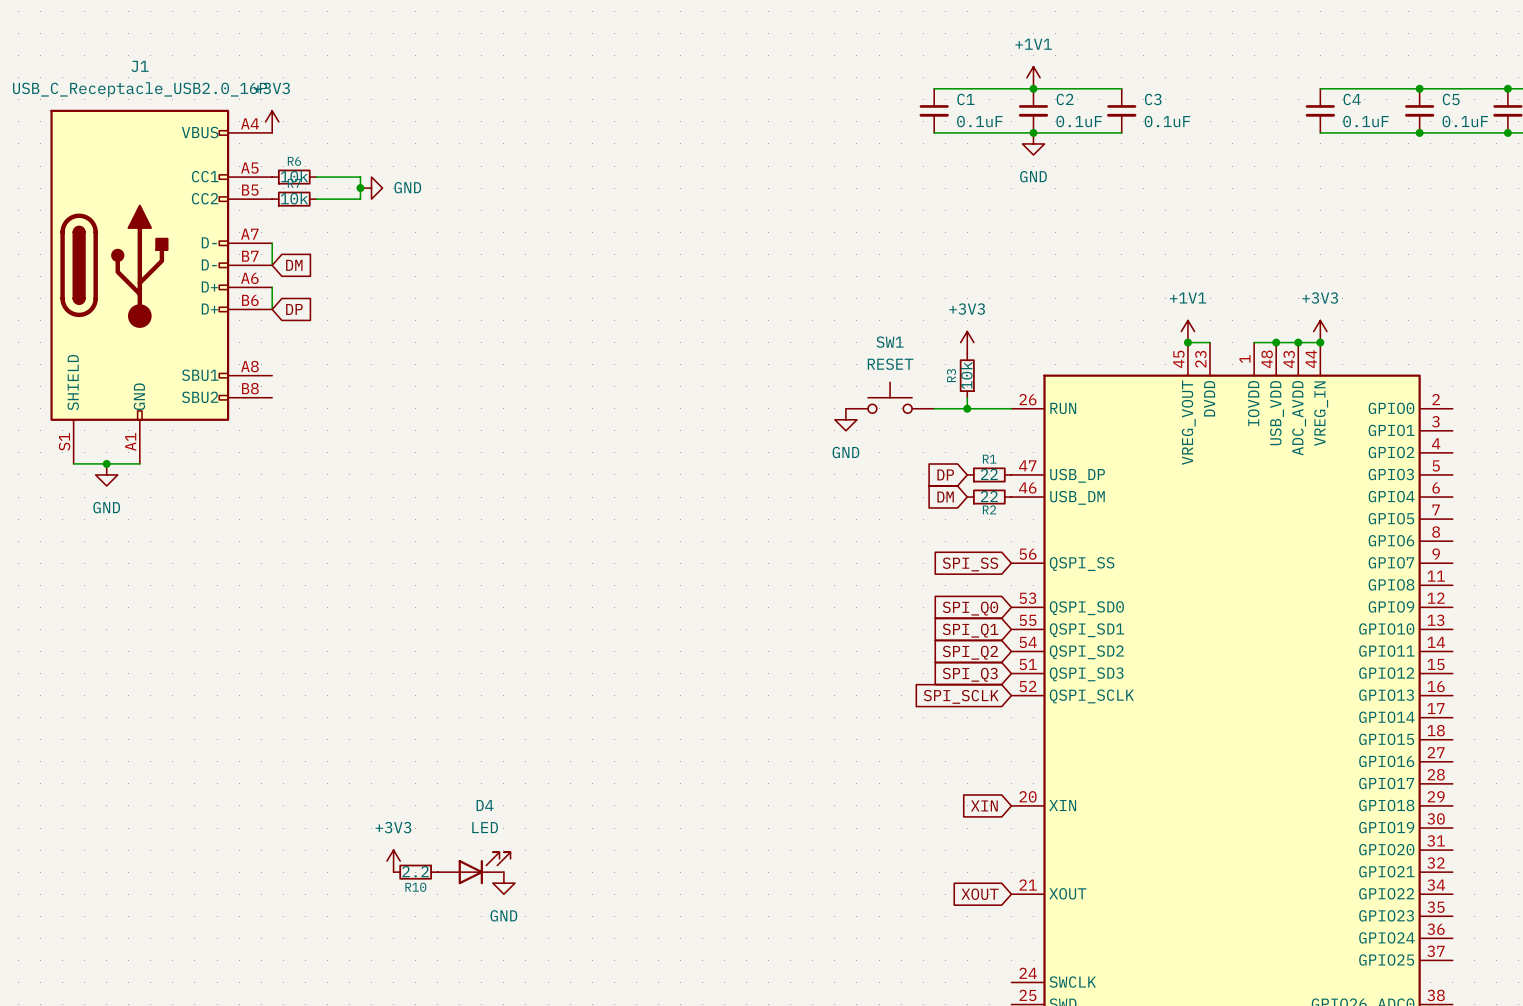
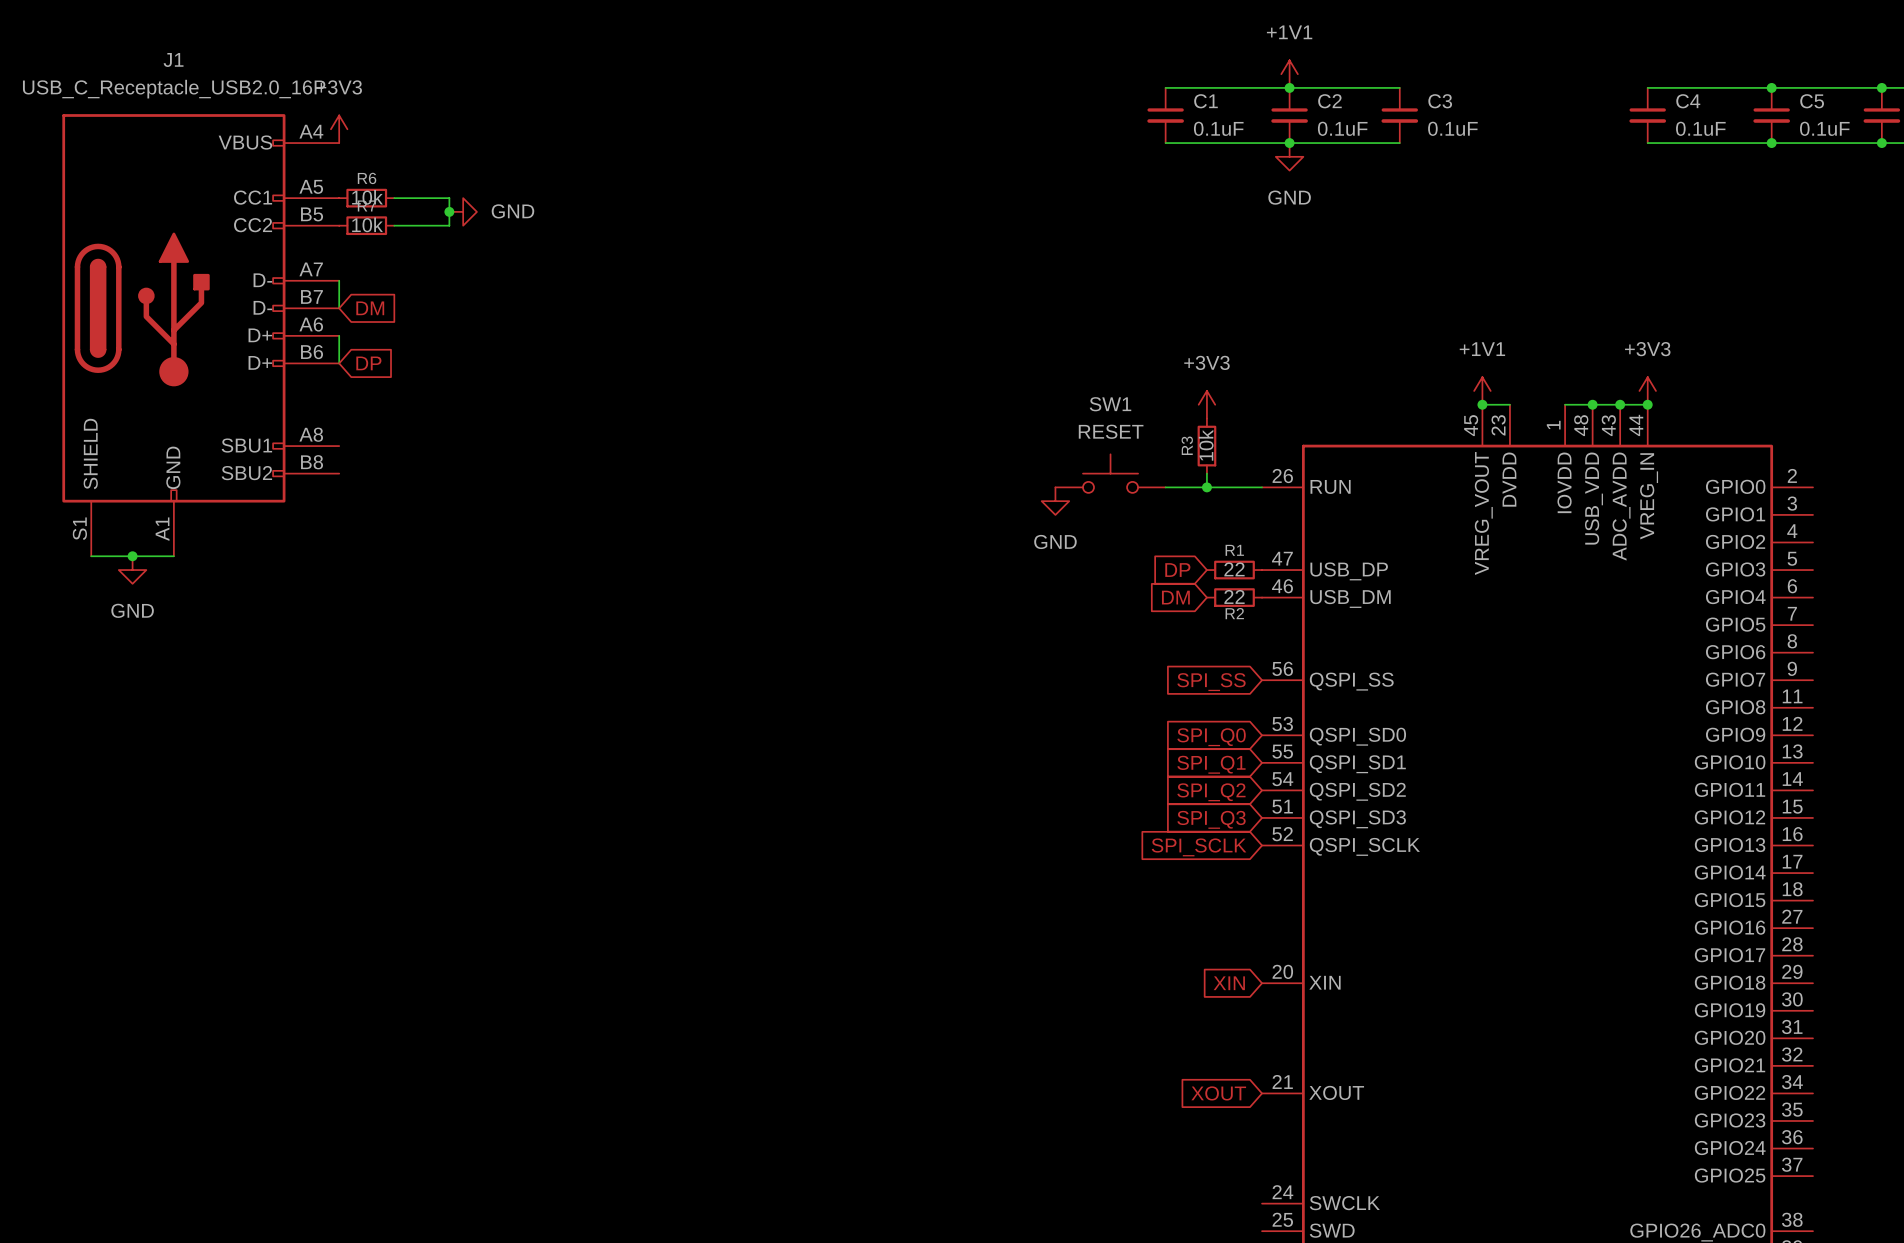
power symbol: +3V3 (393, 861) -> none
D4: LED (474, 868) -> none
R10: 2.2 (415, 872) -> none
power symbol: GND (503, 883) -> none

